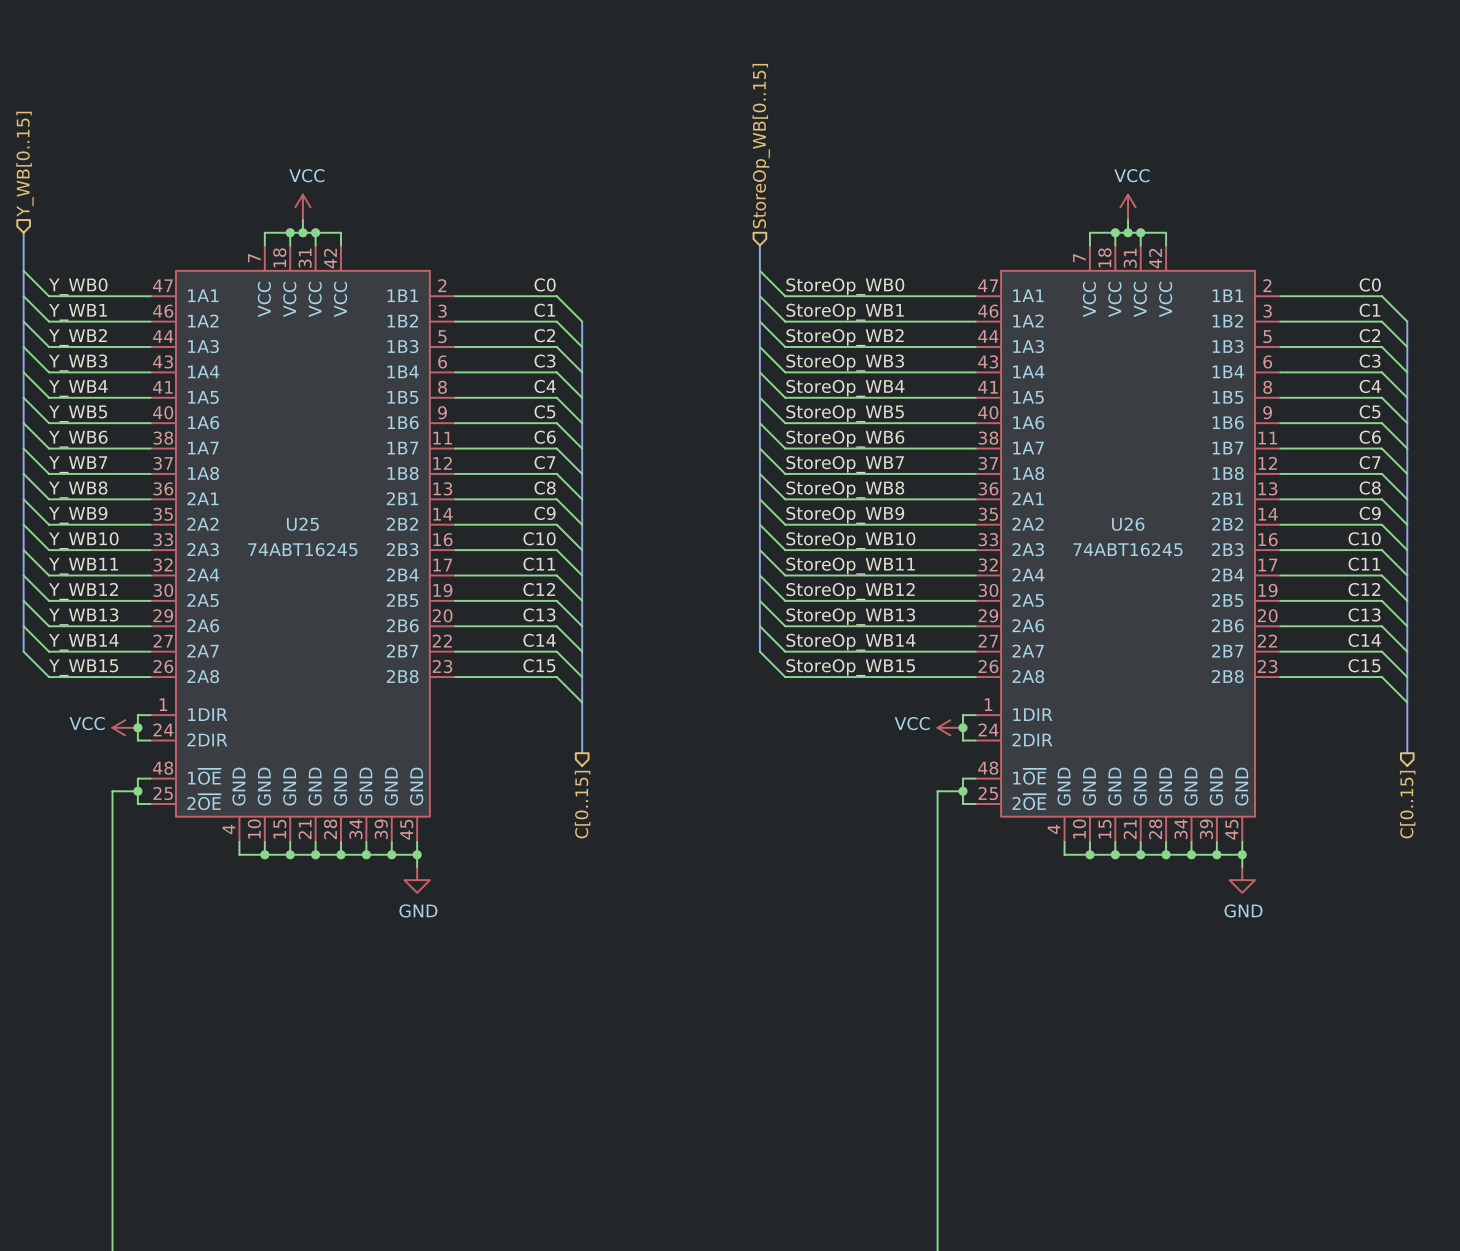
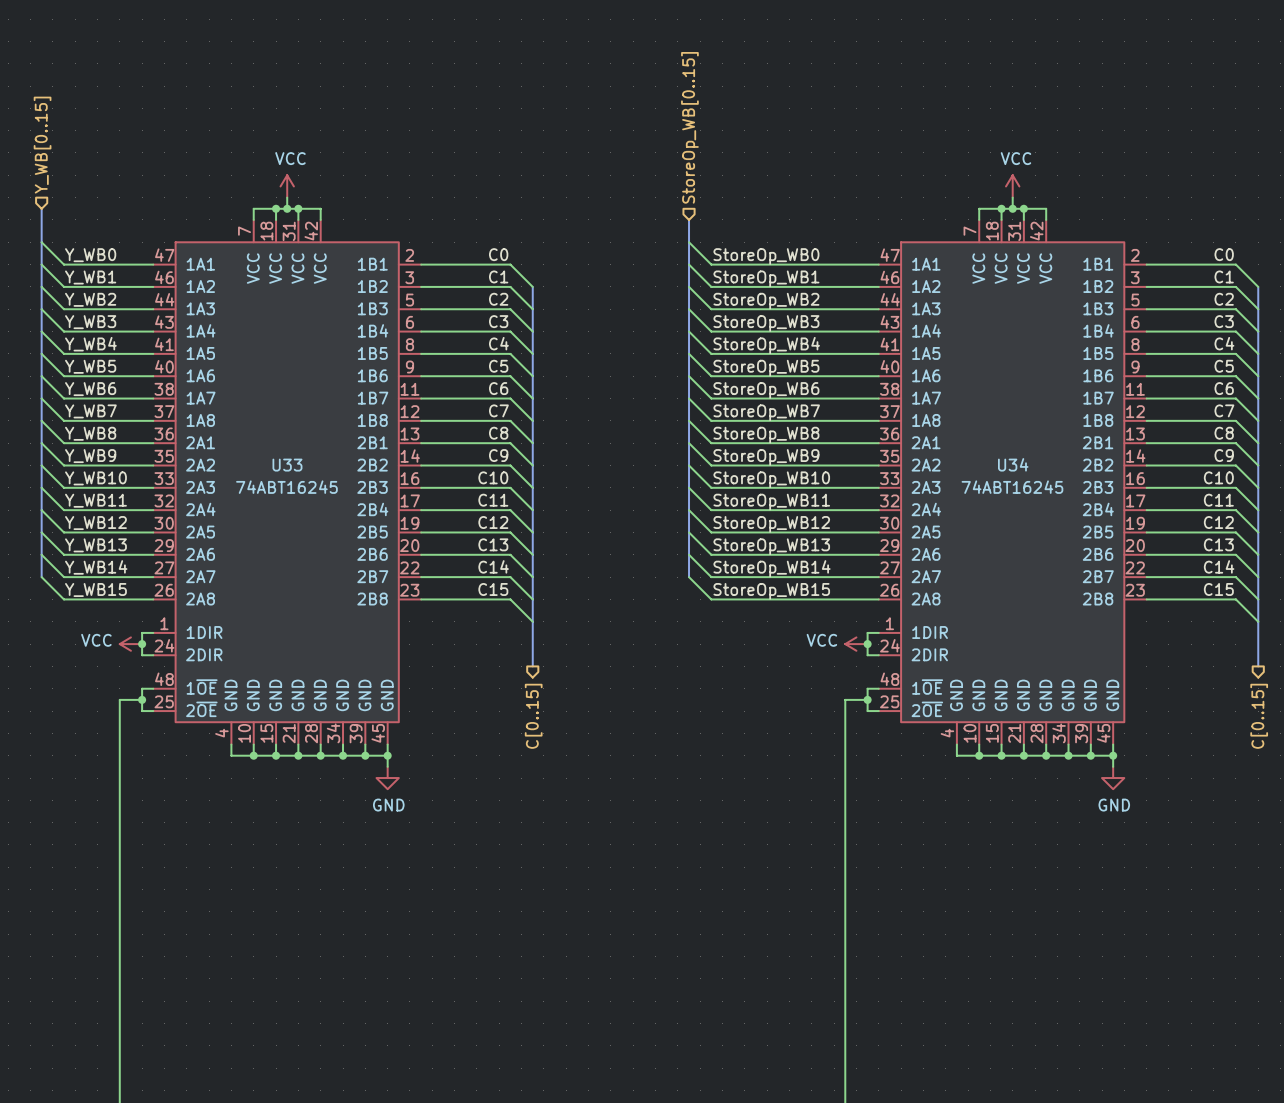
U25 name: U25 (302, 524) -> U33 (287, 465)
U26 name: U26 (1128, 524) -> U34 (1013, 464)

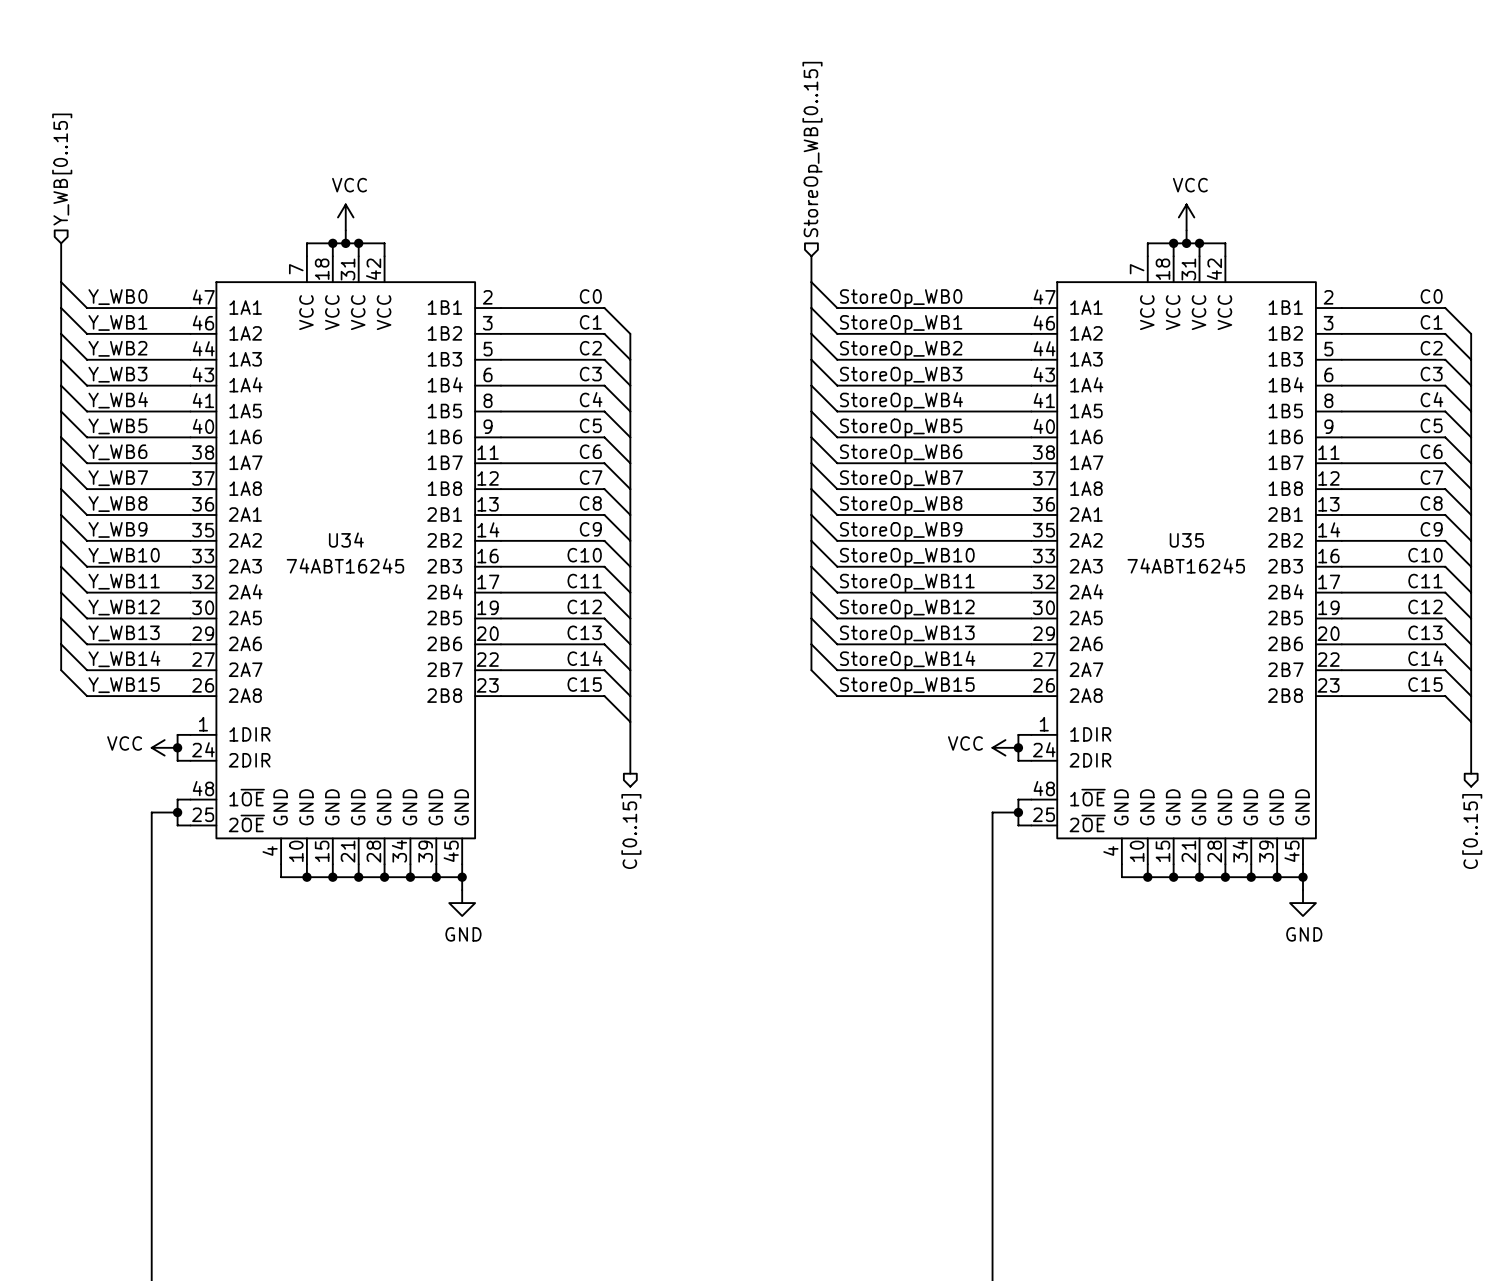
U34 name: U34 (1013, 464) -> U35 (1186, 540)
U33 name: U33 (287, 465) -> U34 (346, 540)

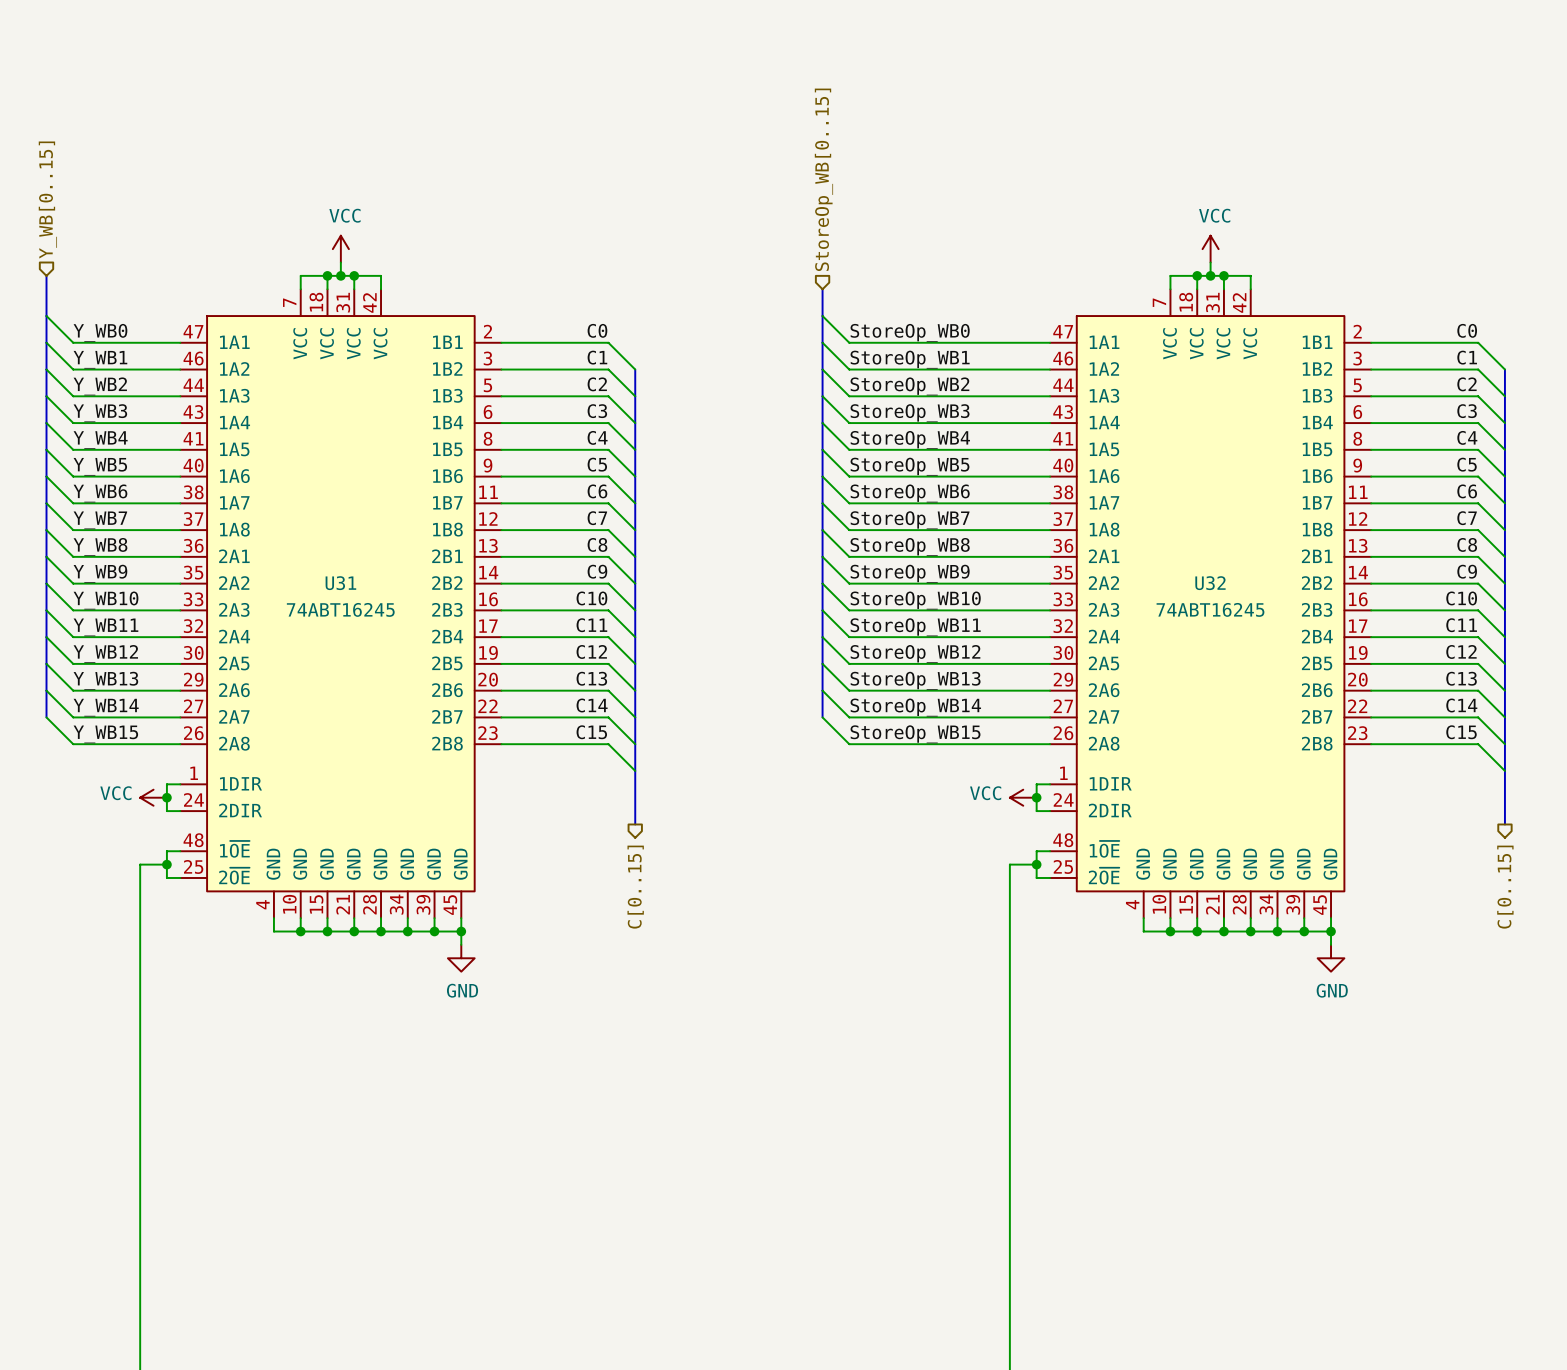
U34 name: U34 (346, 540) -> U31 (340, 583)
U35 name: U35 (1186, 540) -> U32 (1210, 583)

